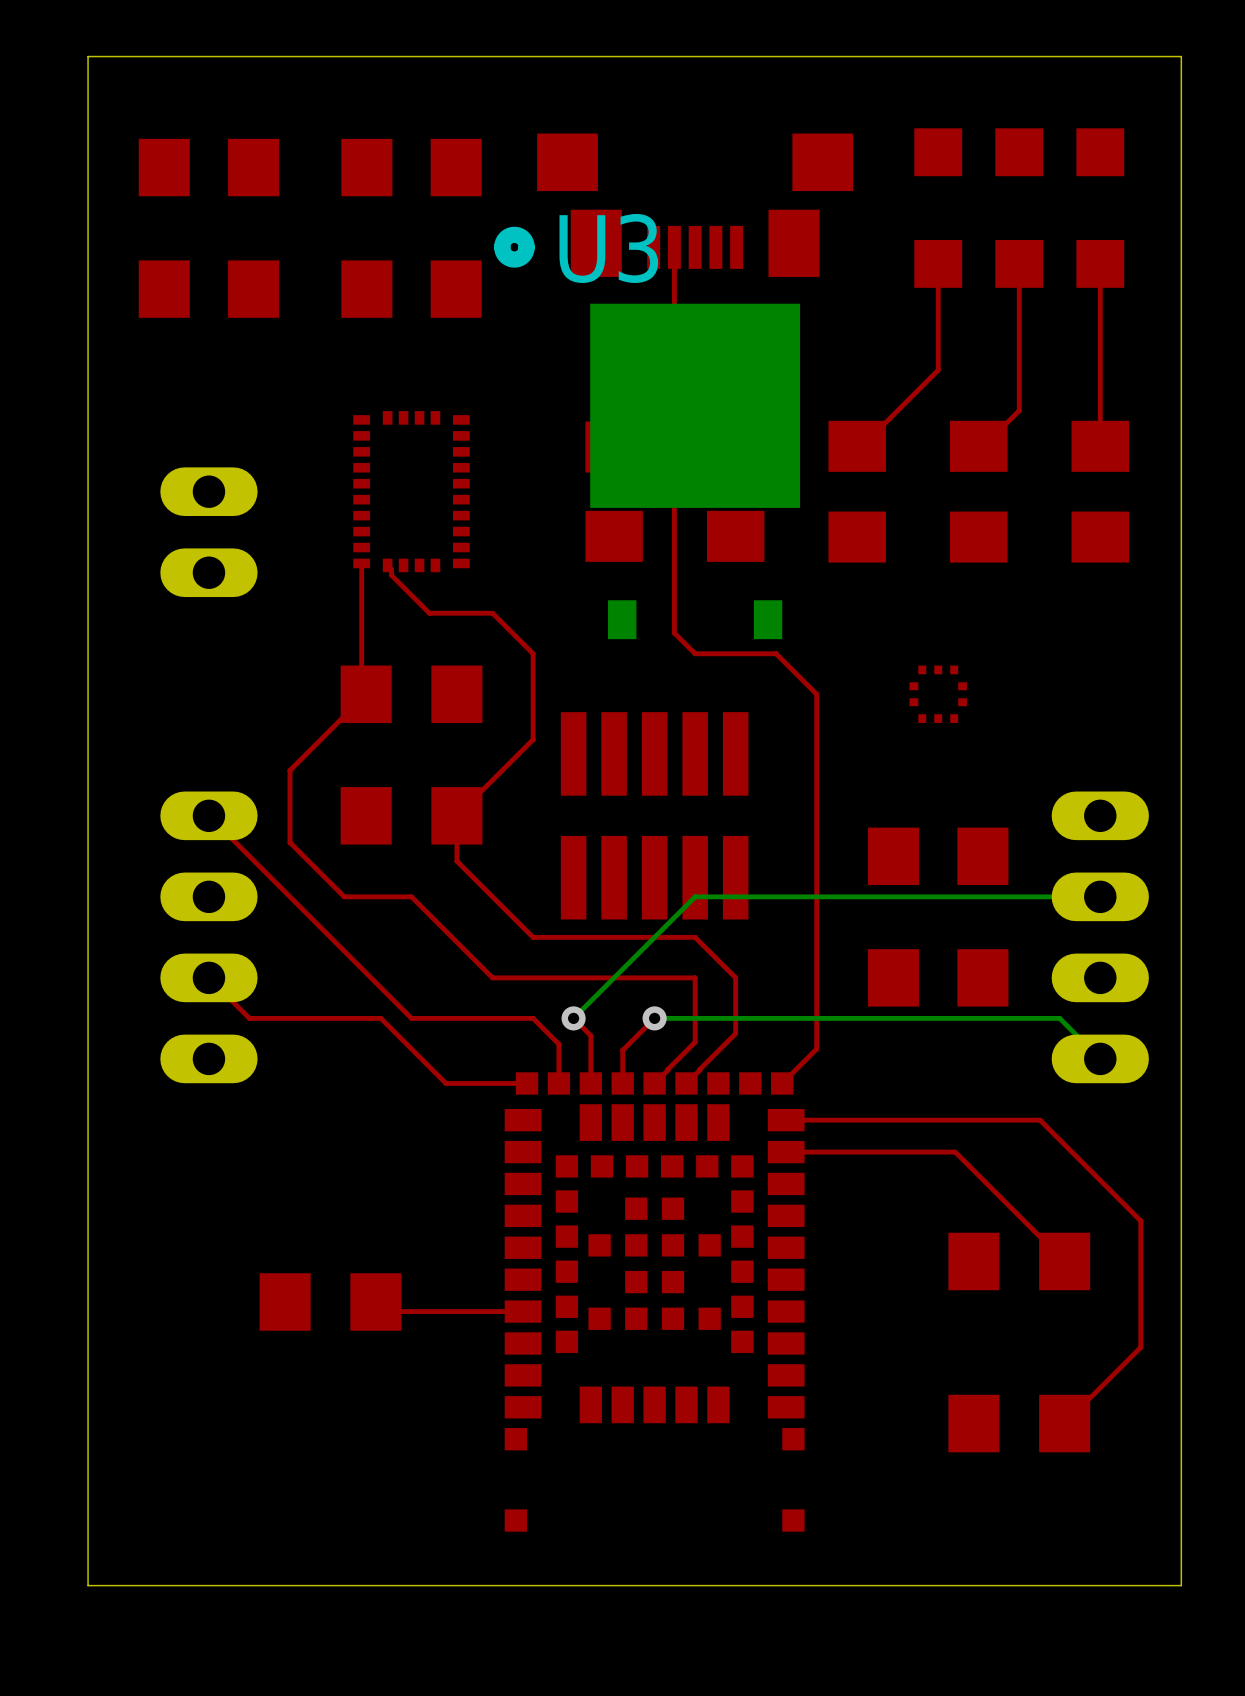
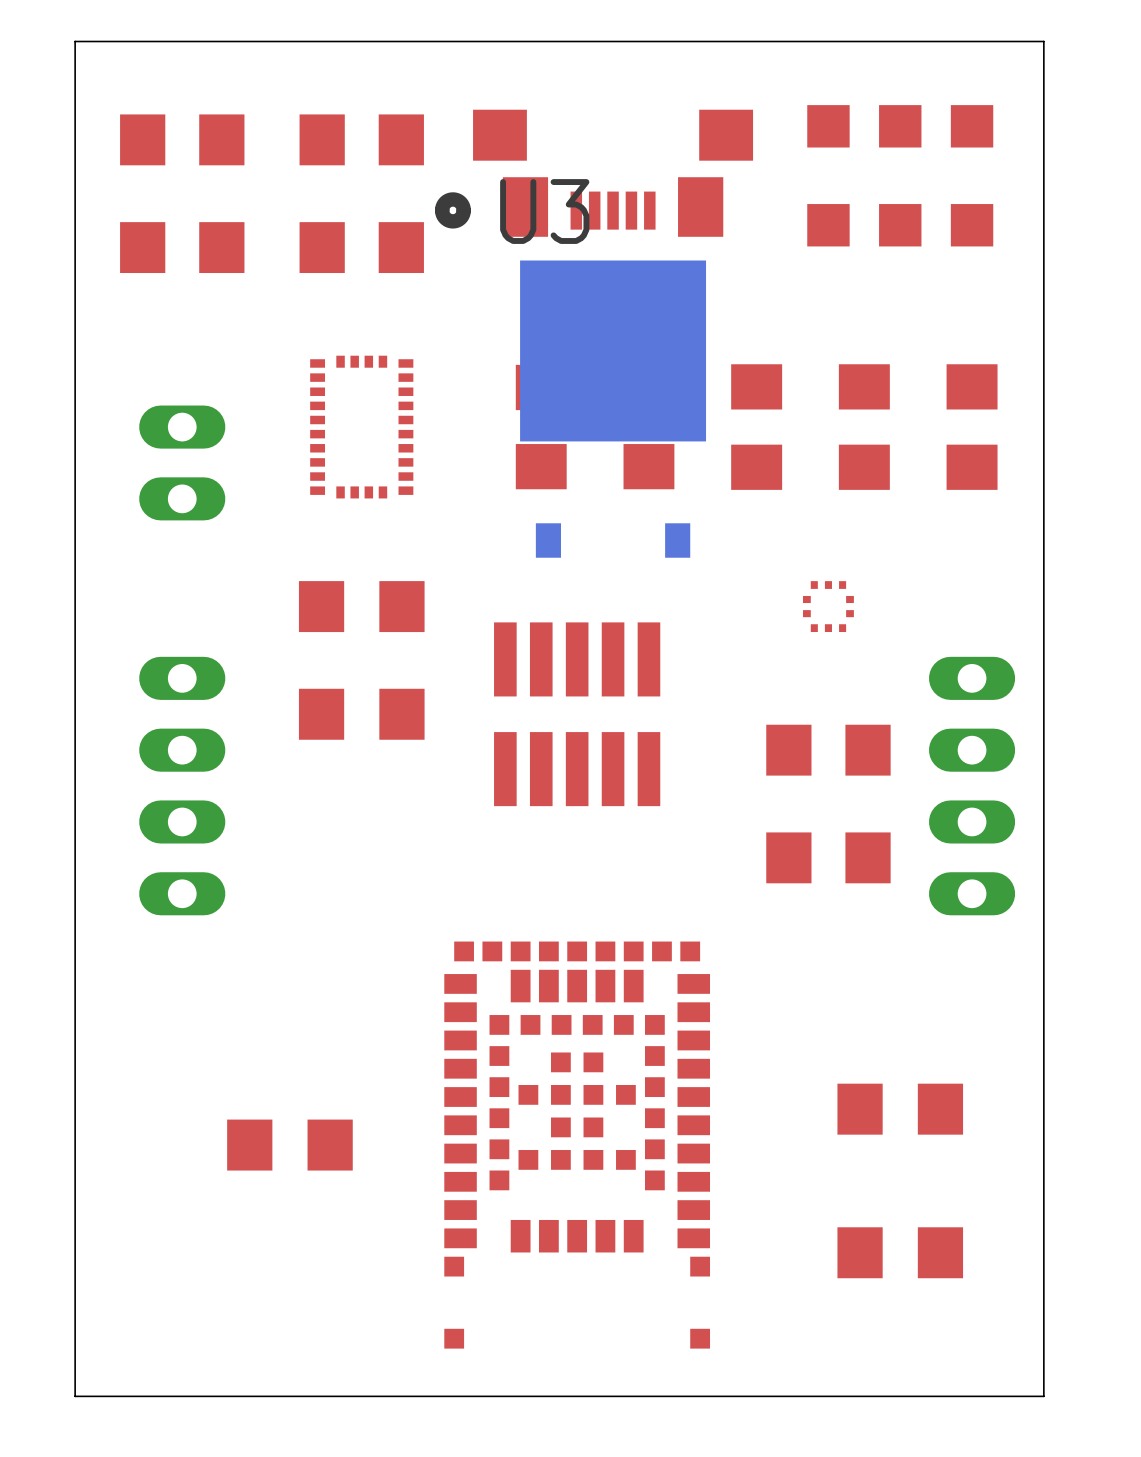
top track: (674, 247) (674, 633) (695, 653) (776, 653) (816, 694) (816, 1049) (782, 1083) -> none
top track: (938, 263) (938, 370) (862, 446) (857, 446) -> none
top track: (1019, 263) (1019, 410) (983, 446) (978, 446) -> none
top track: (1100, 263) (1100, 446) -> none
top track: (361, 563) (361, 689) (366, 694) (289, 770) (289, 842) (344, 896) (411, 896) (492, 977) (695, 977) (695, 1042) (654, 1083) -> none
top track: (387, 565) (391, 569) (391, 575) (429, 613) (492, 613) (533, 653) (533, 739) (456, 815) (456, 861) (533, 937) (695, 937) (735, 977) (735, 1033) (686, 1083) -> none
top track: (208, 815) (411, 1018) (533, 1018) (558, 1044) (558, 1083) -> none
bottom track: (1100, 896) (695, 896) (573, 1018) -> none
part position: (208, 937) -> (182, 786)
part position: (1100, 937) -> (972, 786)
top track: (208, 977) (249, 1018) (380, 1018) (445, 1083) (527, 1083) -> none
top track: (573, 1018) (590, 1035) (590, 1083) -> none
via: (573, 1018) -> none
top track: (654, 1018) (622, 1050) (622, 1083) -> none
bottom track: (654, 1018) (1059, 1018) (1100, 1058) -> none
via: (654, 1018) -> none
top track: (786, 1120) (1040, 1120) (1140, 1220) (1140, 1347) (1064, 1423) -> none
top track: (786, 1152) (955, 1152) (1064, 1261) -> none
top track: (375, 1302) (385, 1311) (523, 1311) -> none

